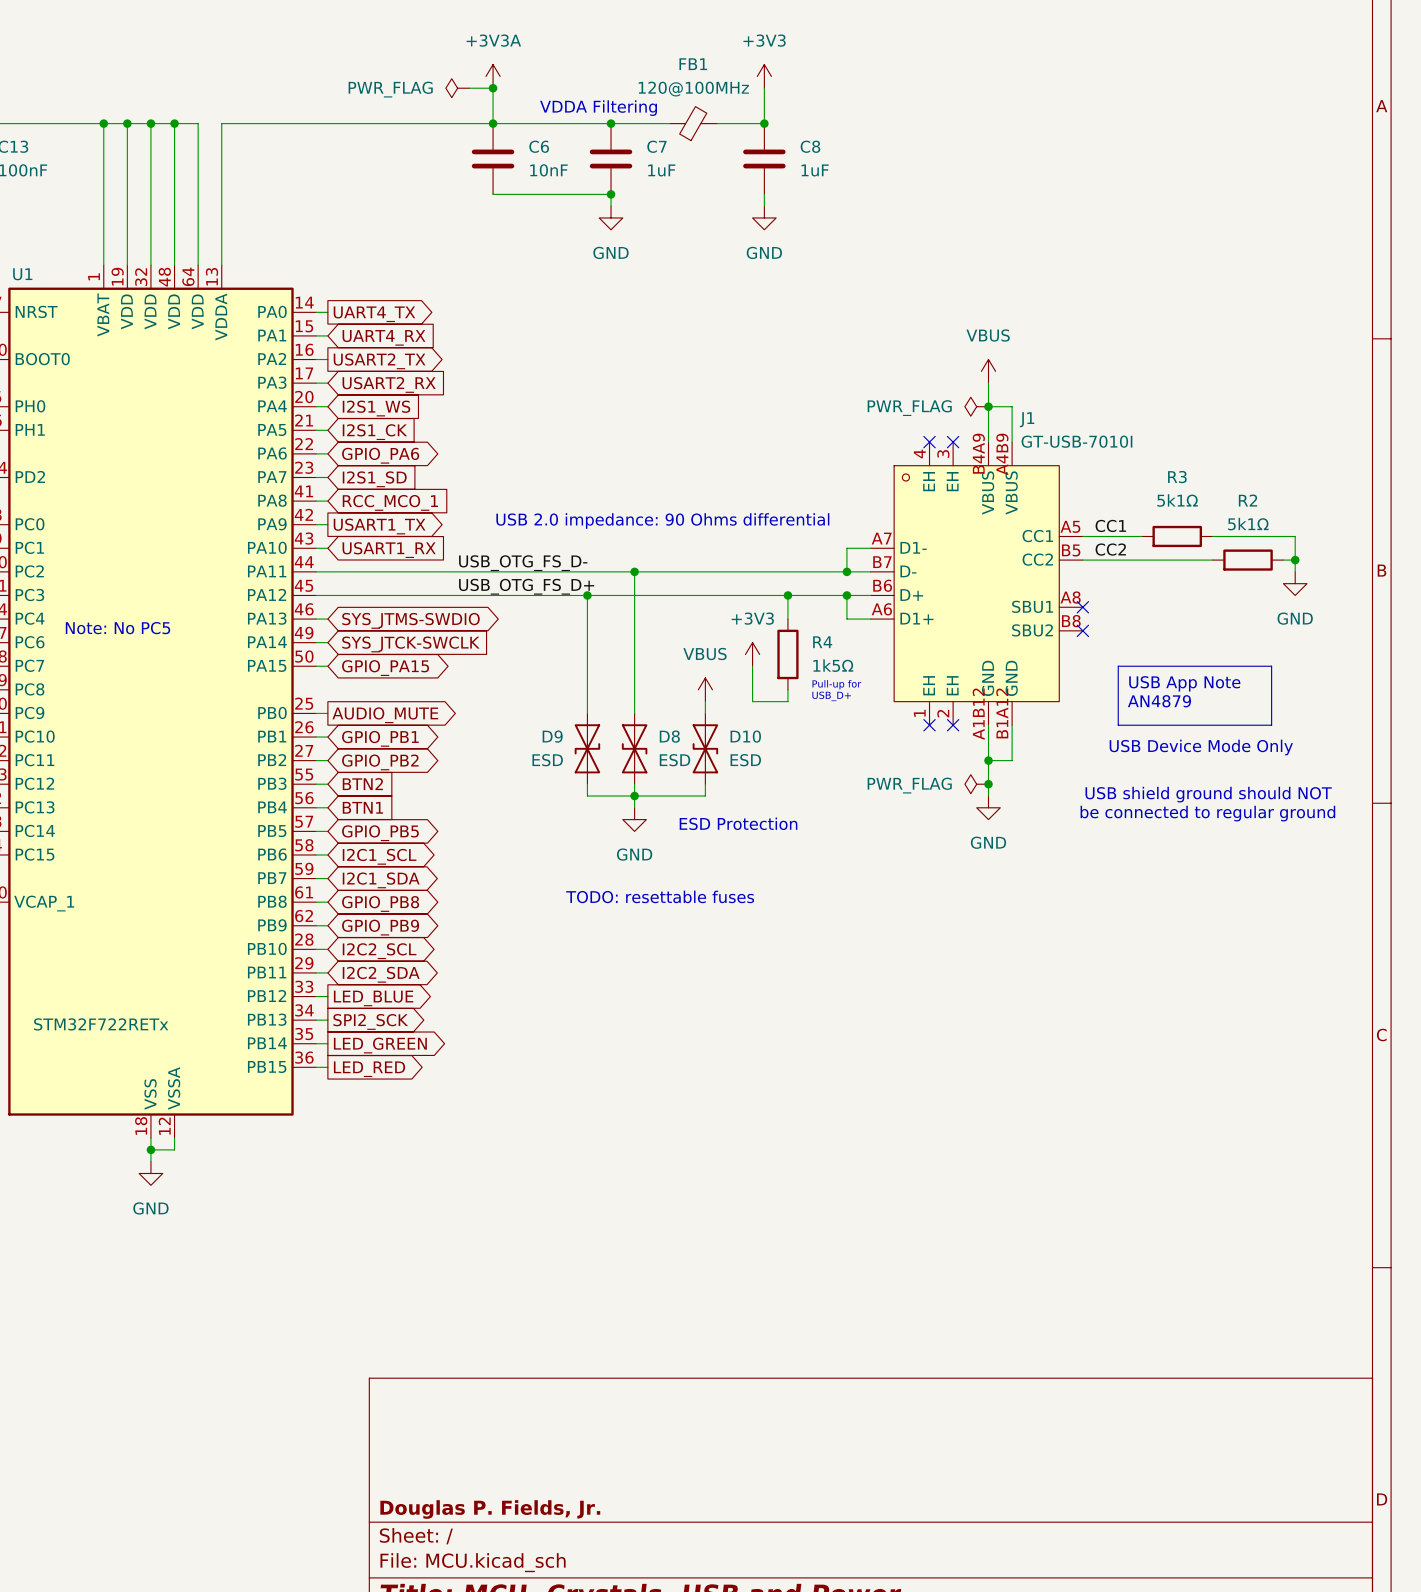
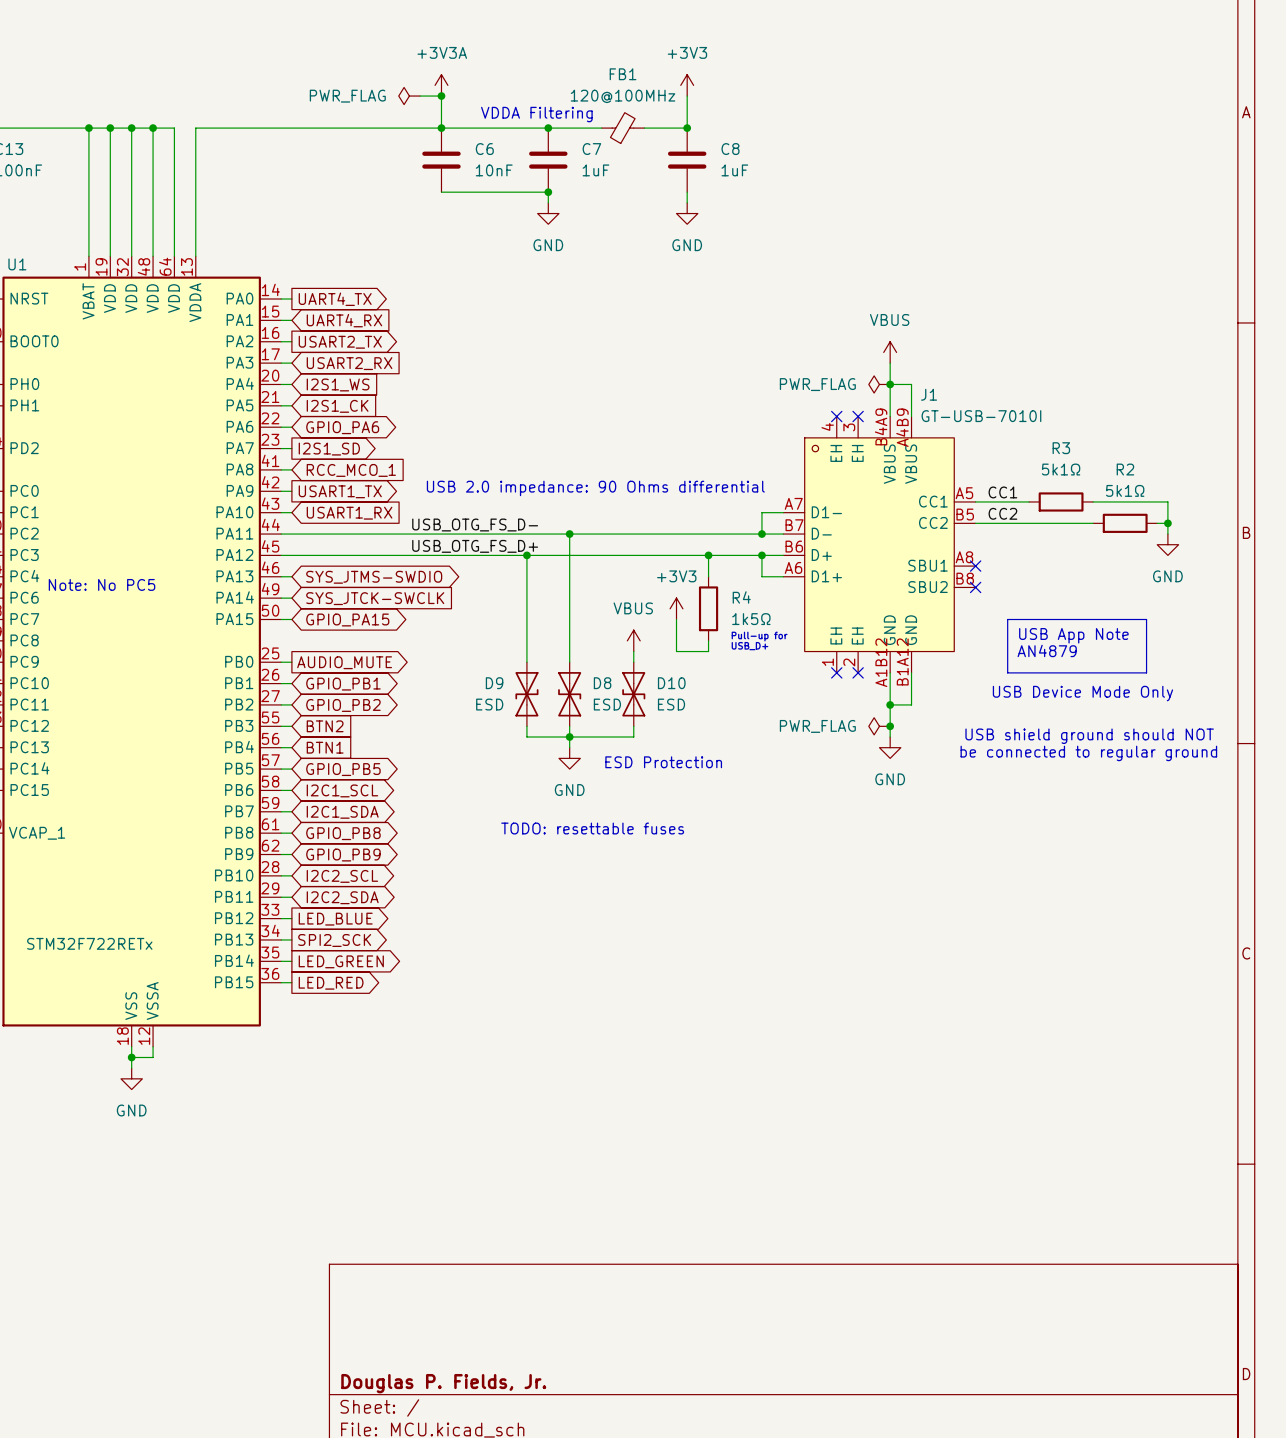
global label shape: input (374, 479) -> output (329, 449)

